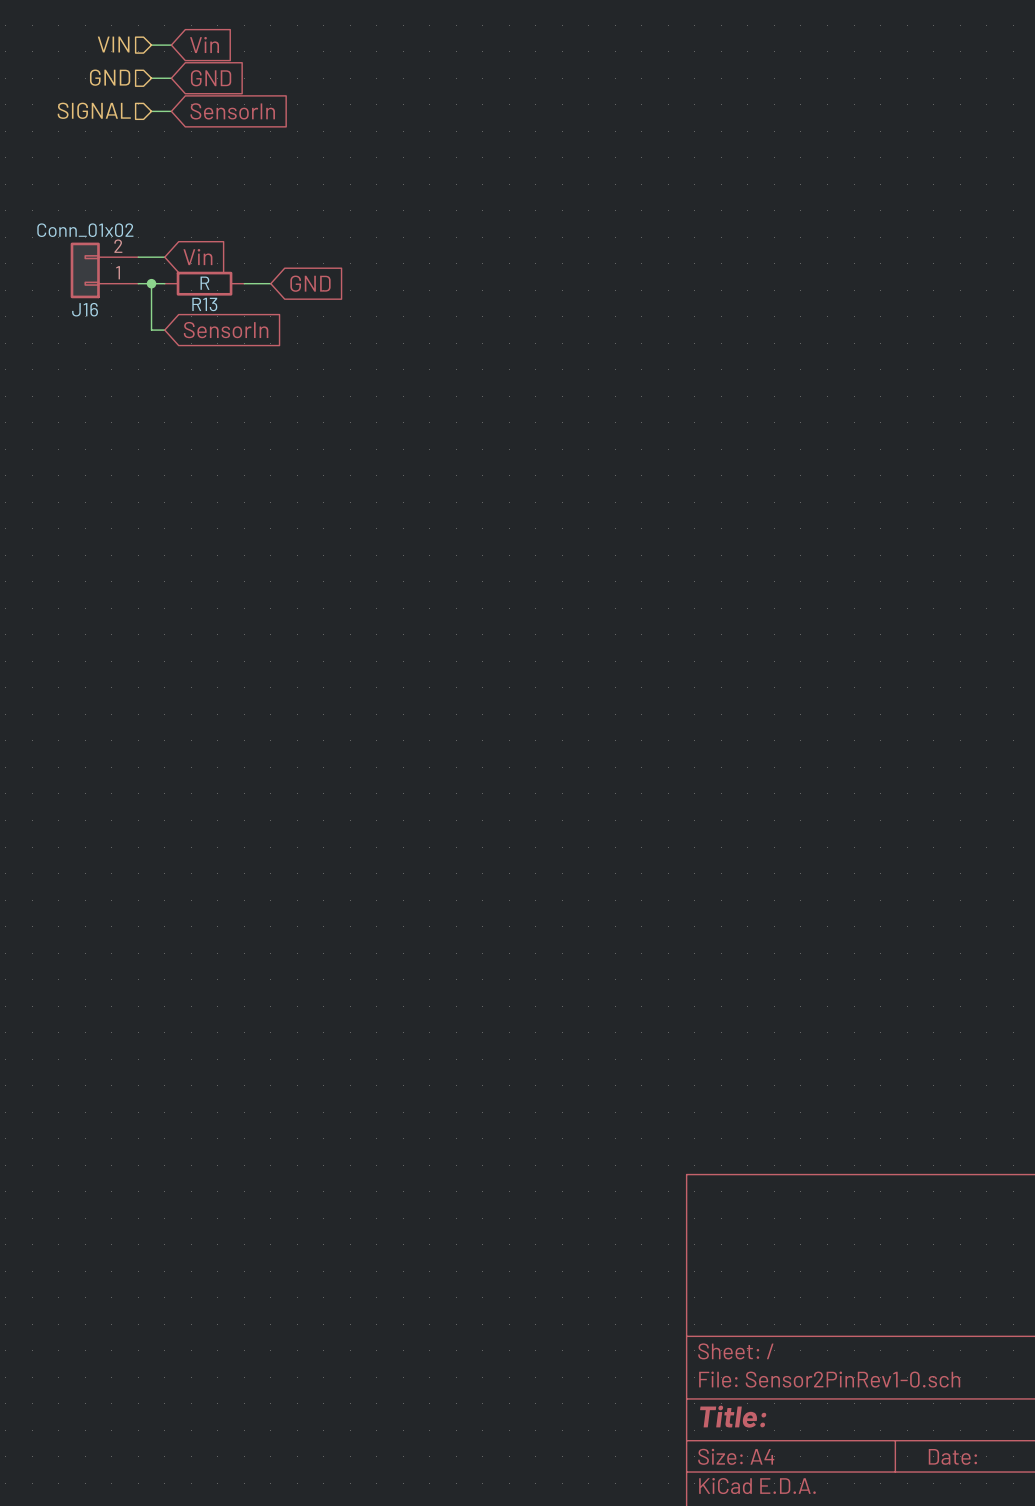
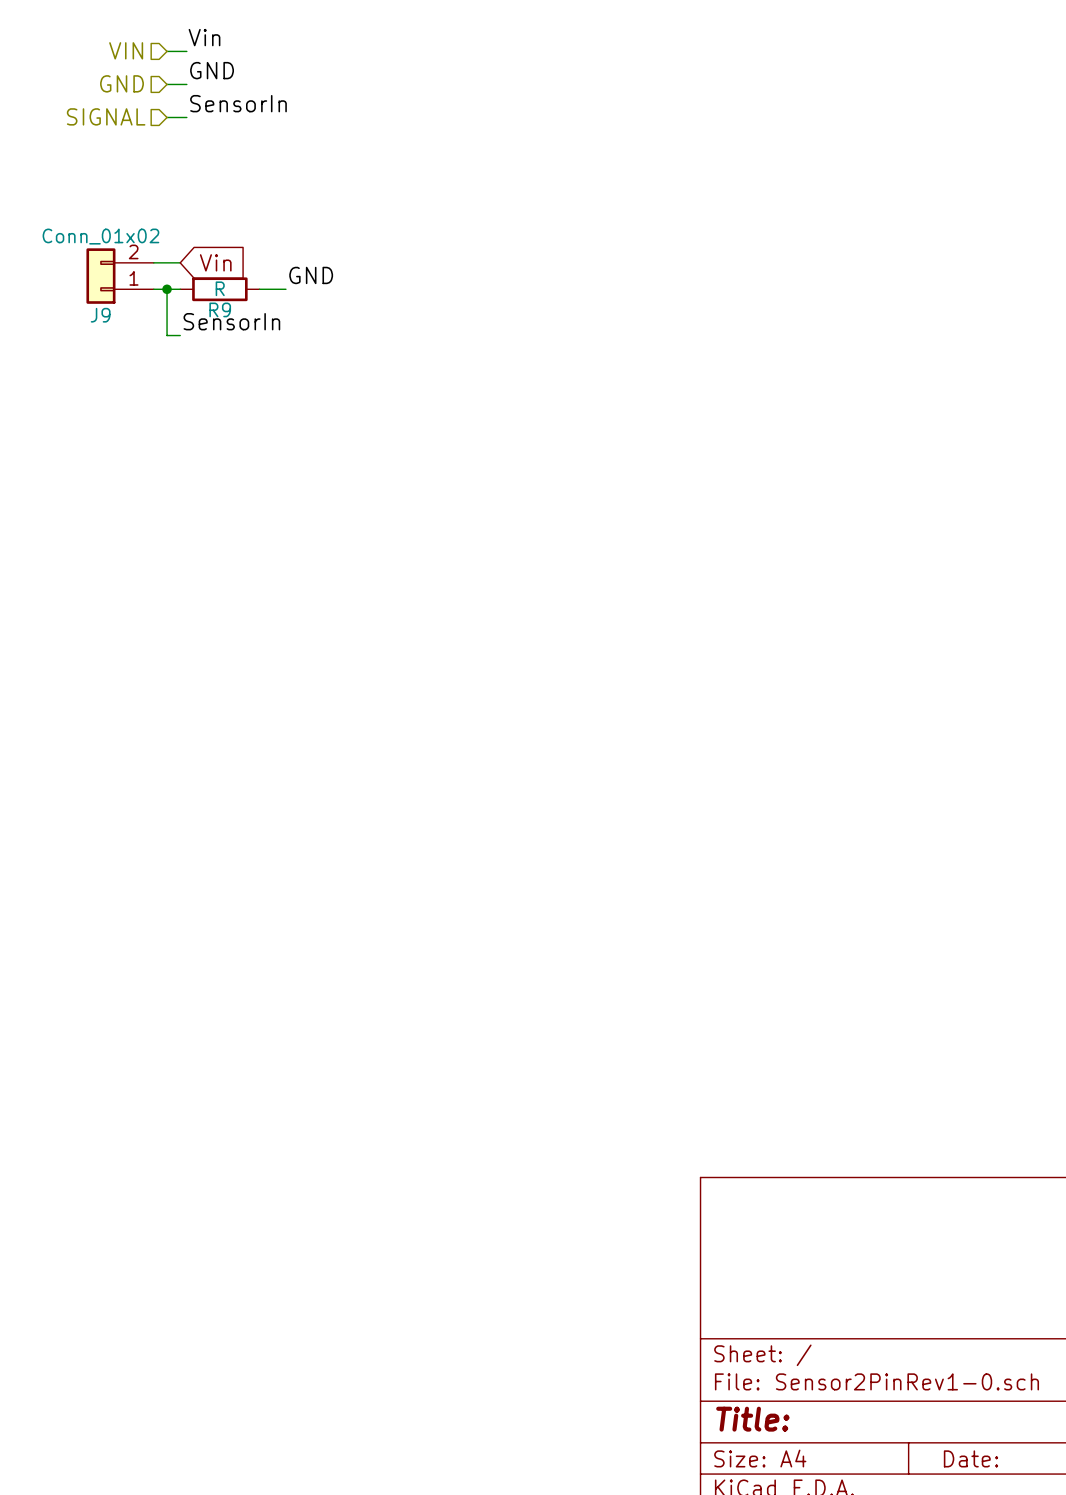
label: none -> Vin (204, 37)
global label: Vin (204, 44) -> none
label: none -> GND (212, 70)
global label: GND (211, 78) -> none
label: none -> SensorIn (238, 103)
global label: SensorIn (232, 111) -> none
label: none -> GND (311, 275)
global label: GND (310, 283) -> none
R13 name: R13 (204, 304) -> R9 (220, 309)
J16 name: J16 (85, 309) -> J9 (100, 315)
label: none -> SensorIn (231, 321)
global label: SensorIn (226, 330) -> none

